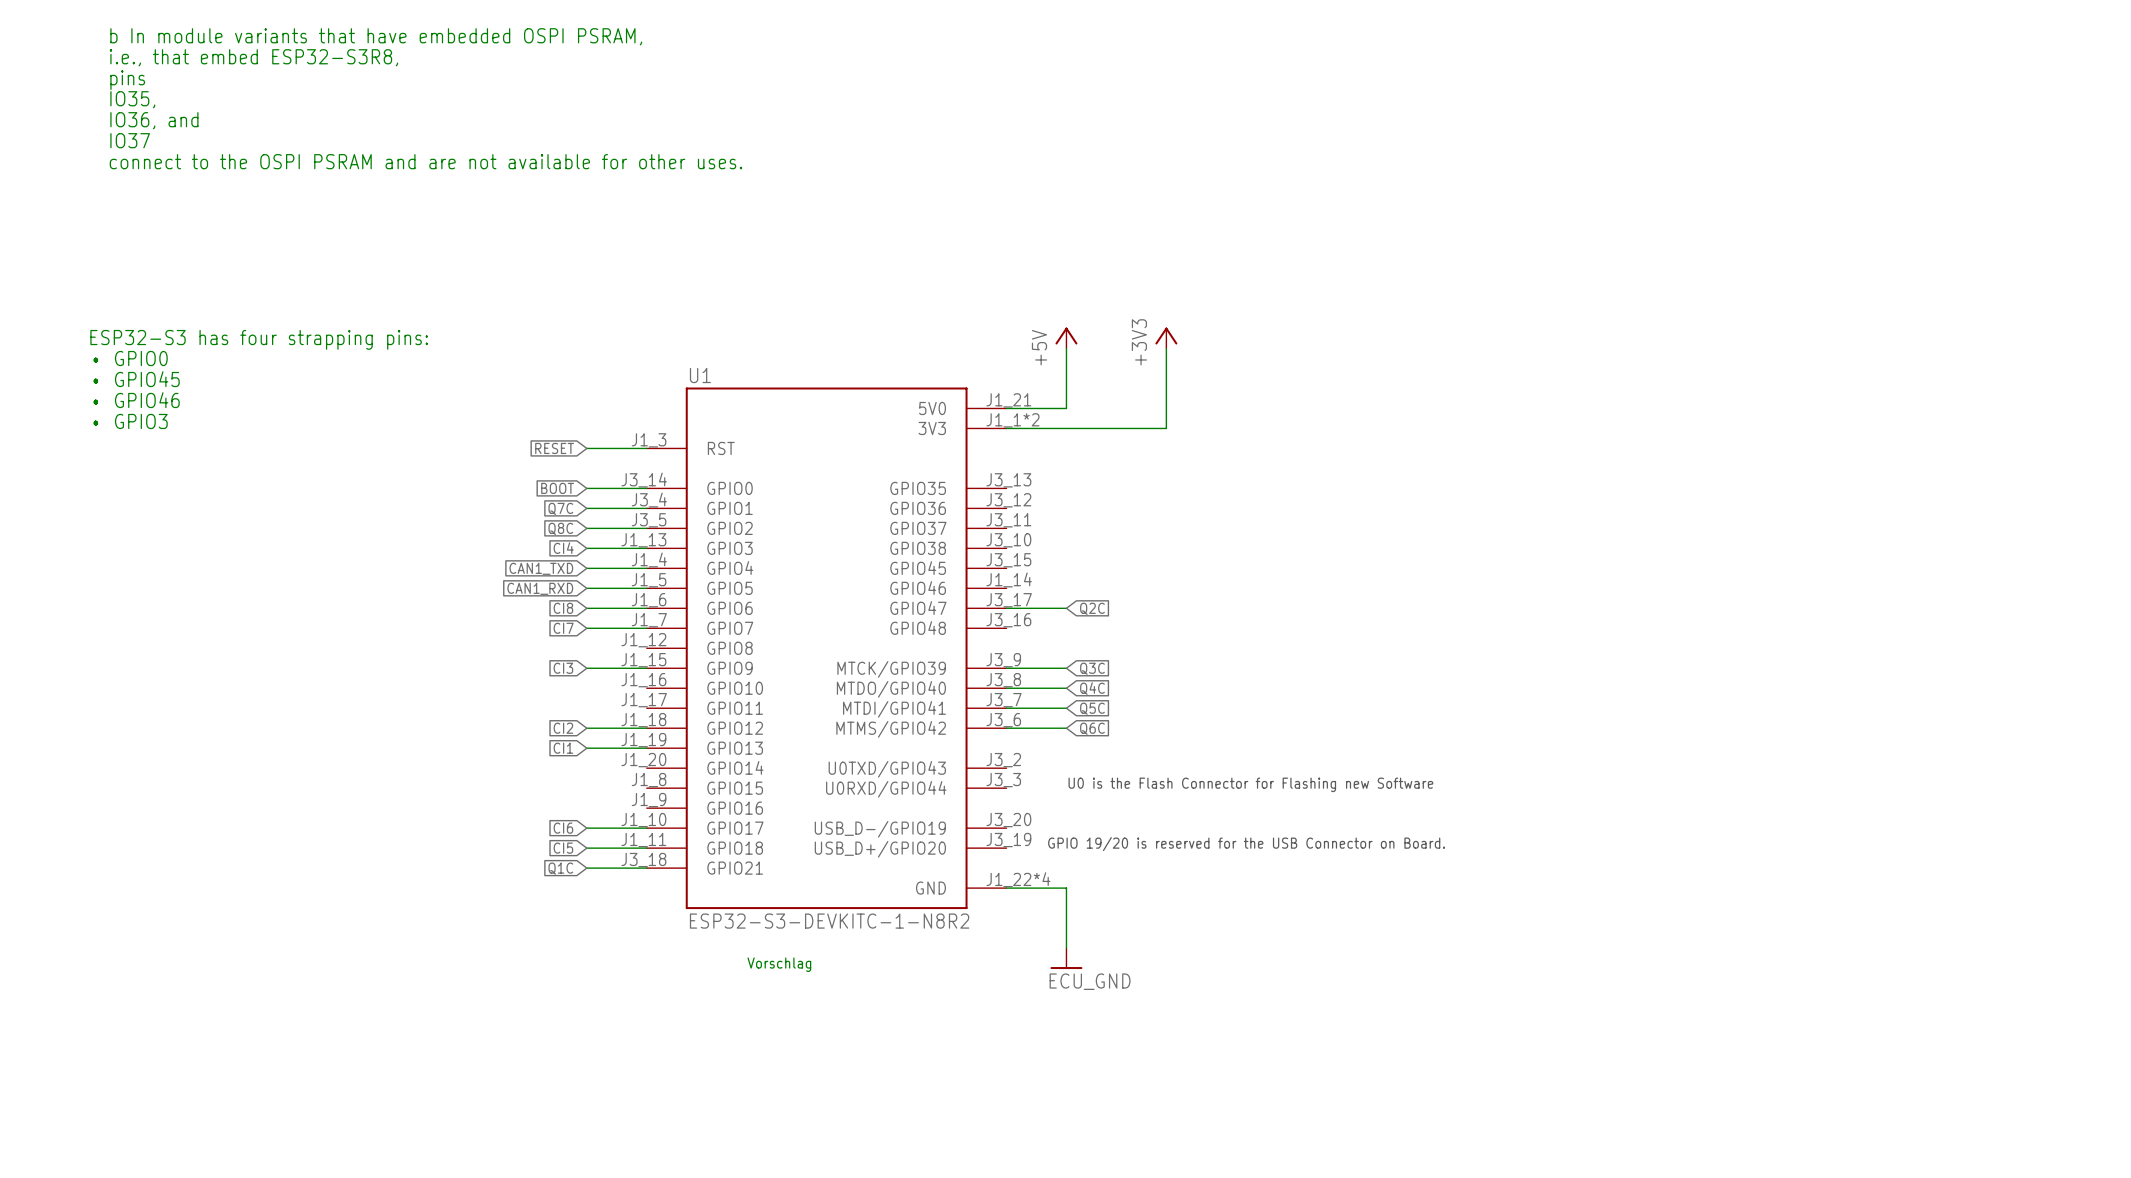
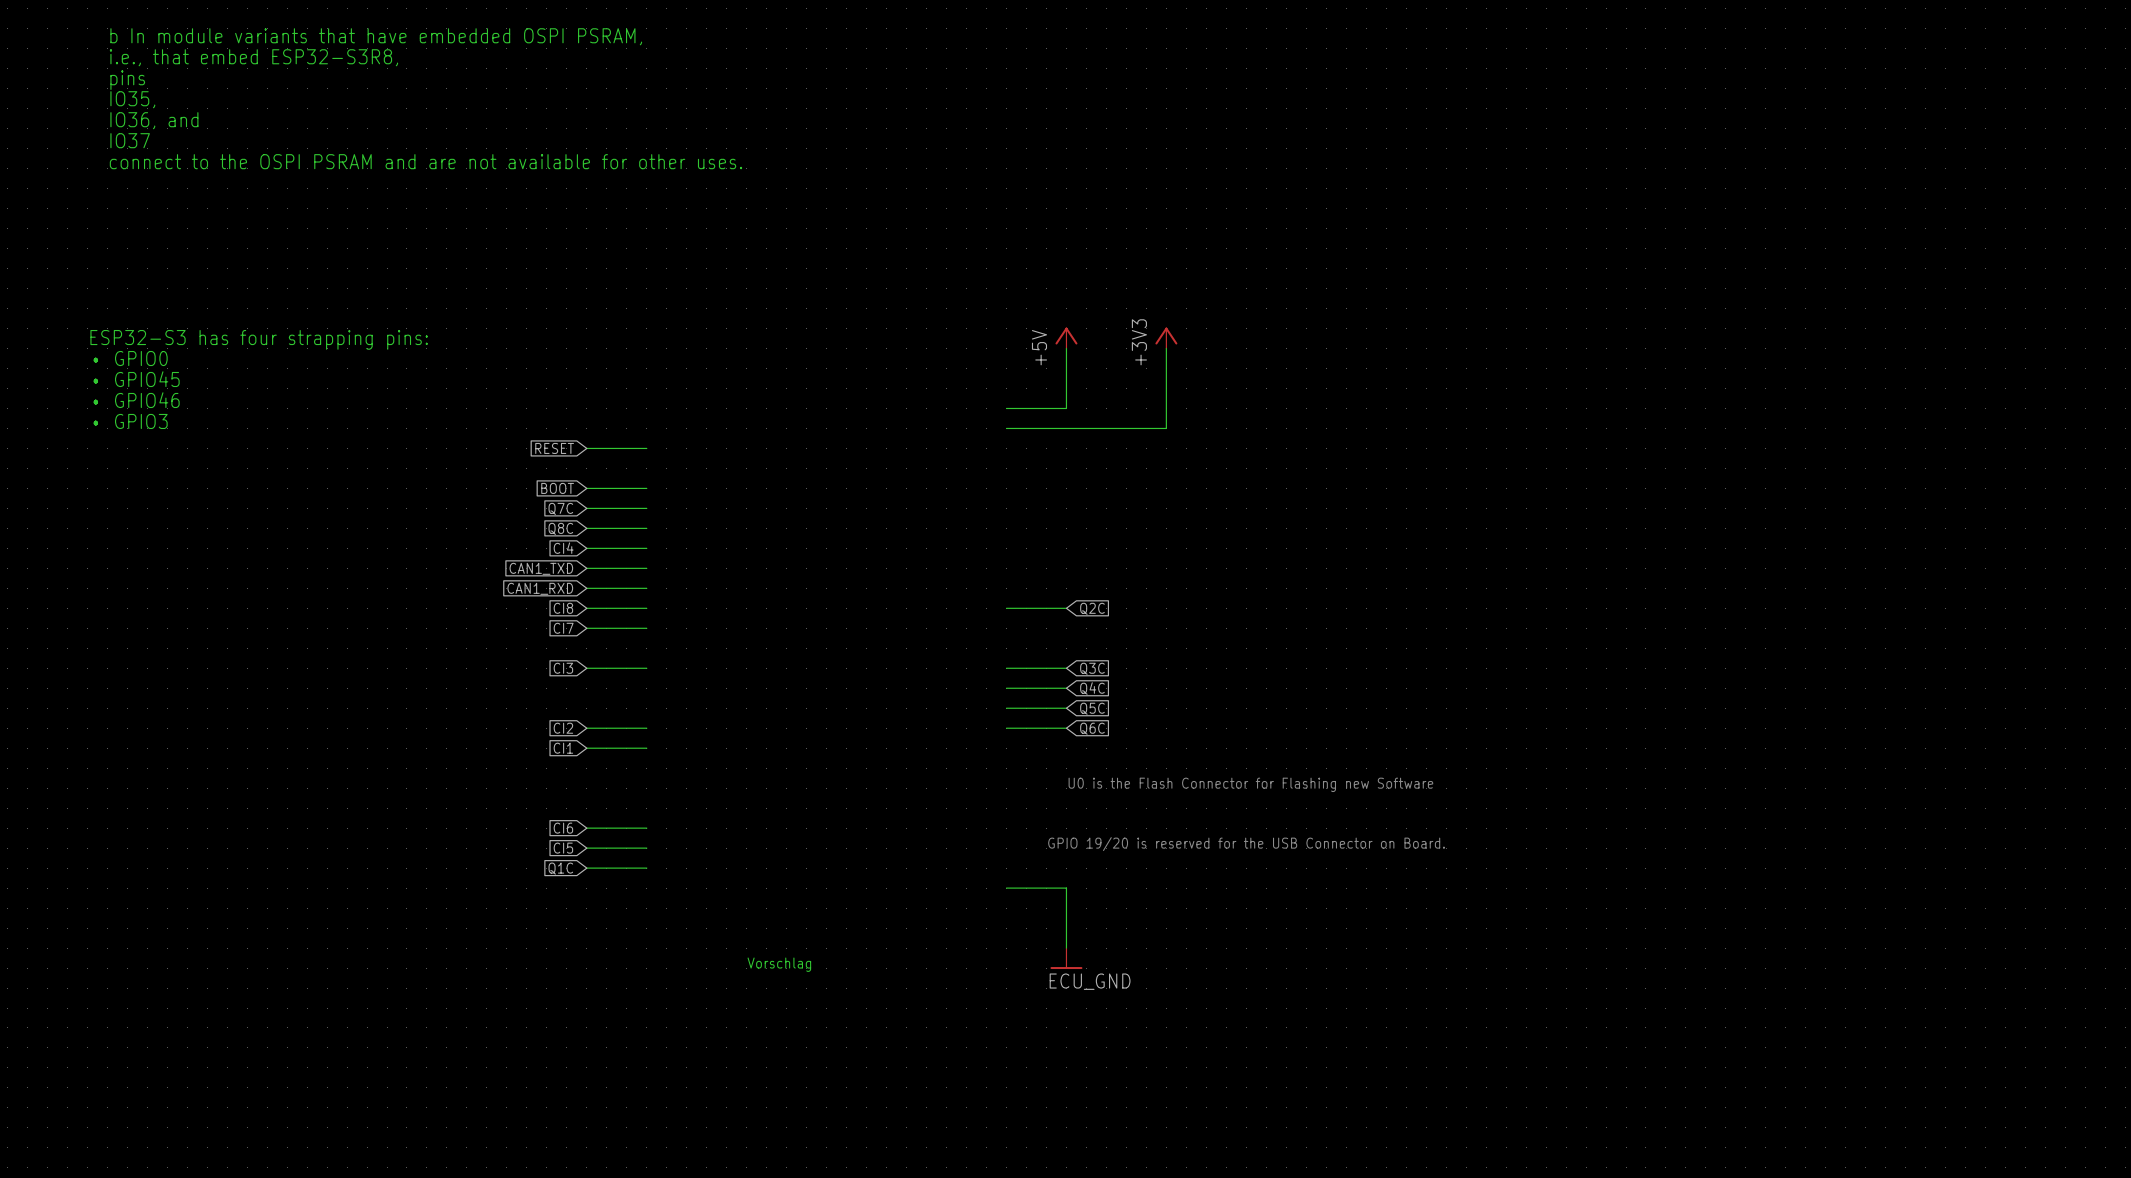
U1: ESP32-S3-DEVKITC-1-N8R2 (826, 648) -> none

